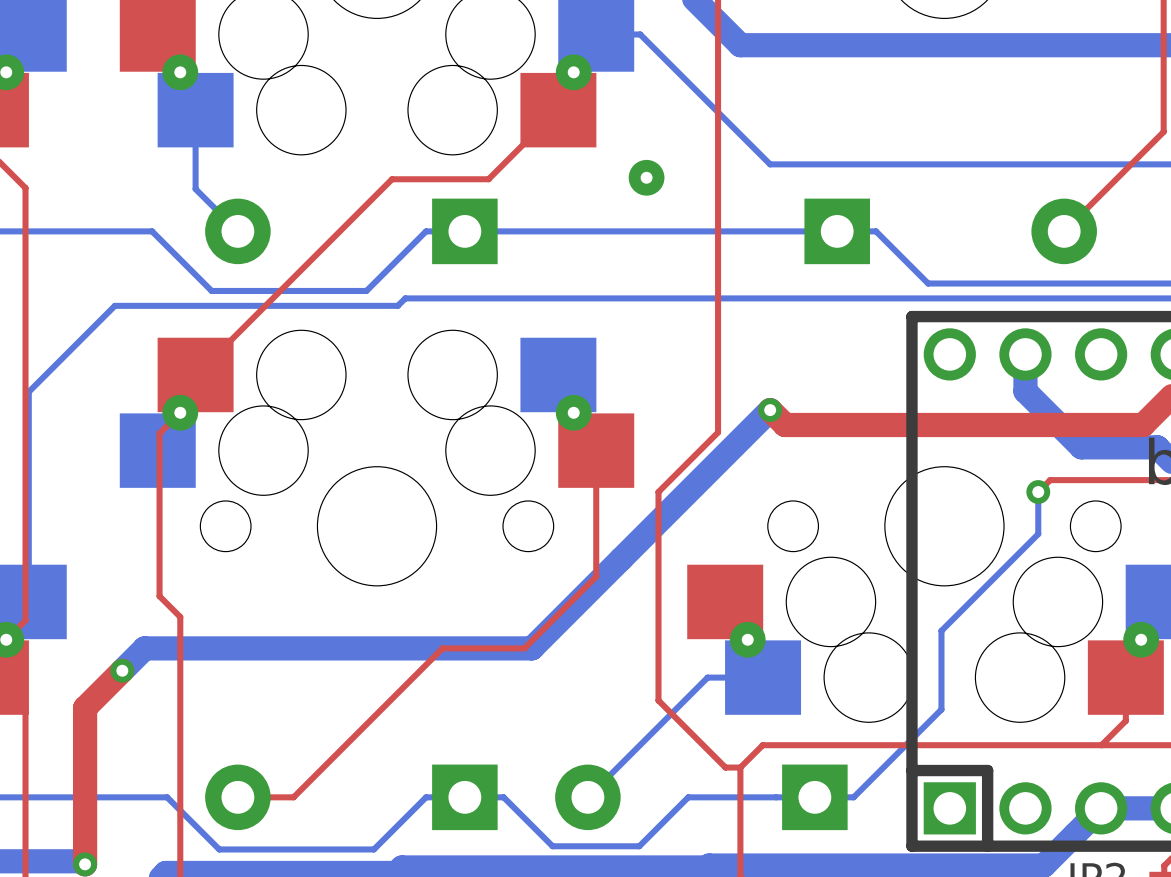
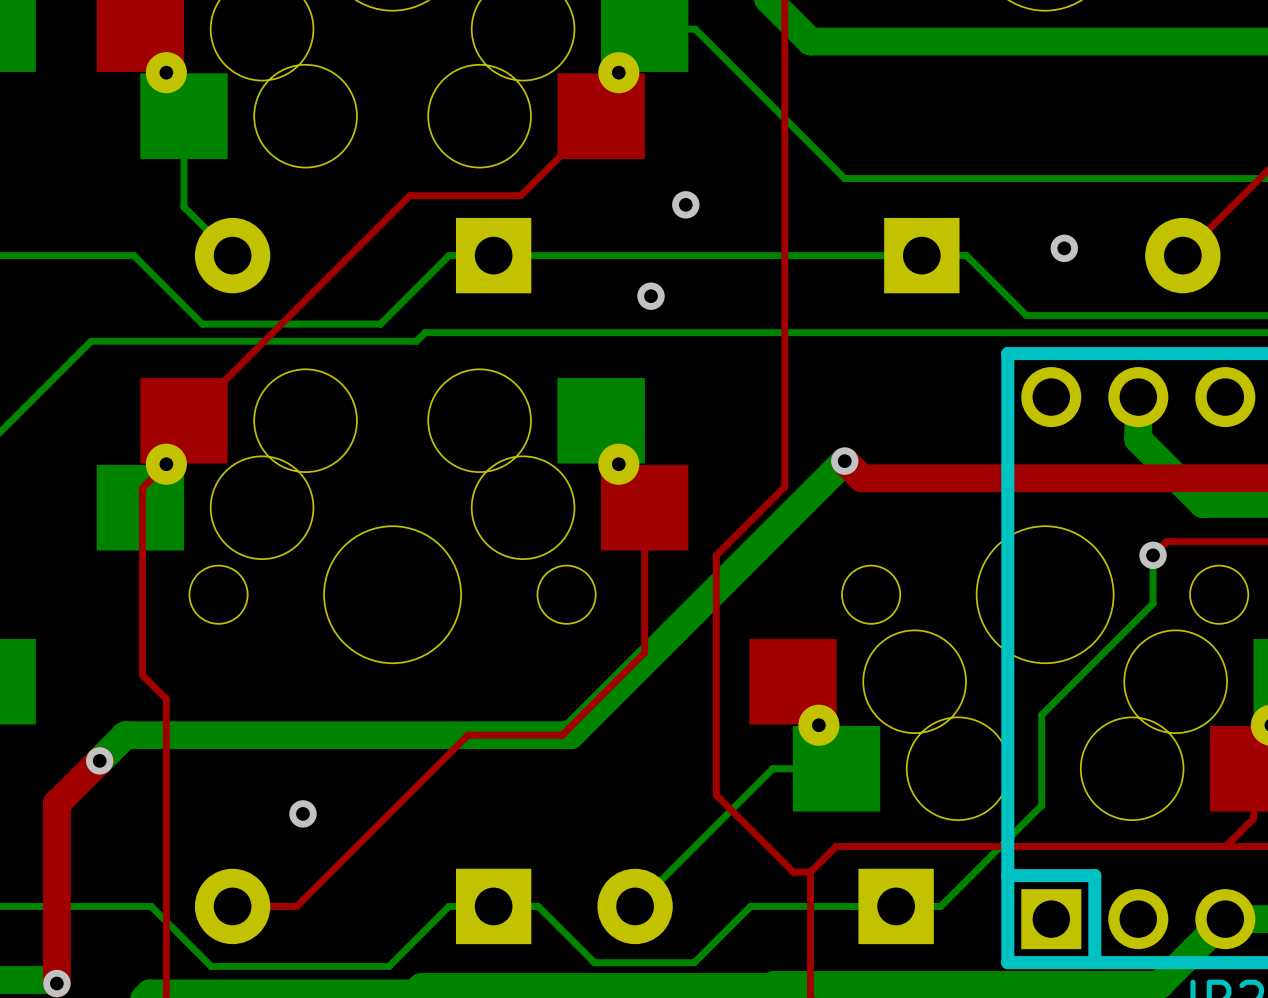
part: (646, 177) -> none
via: none -> (685, 204)
via: none -> (1064, 248)
via: none -> (651, 296)
via: none -> (302, 813)

